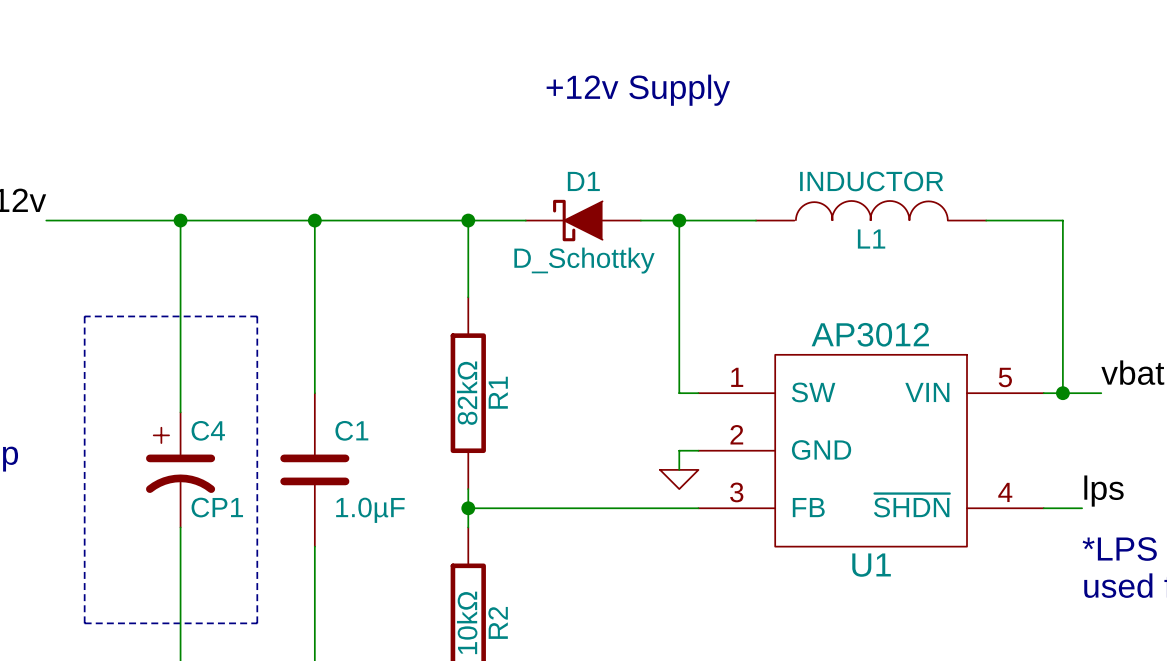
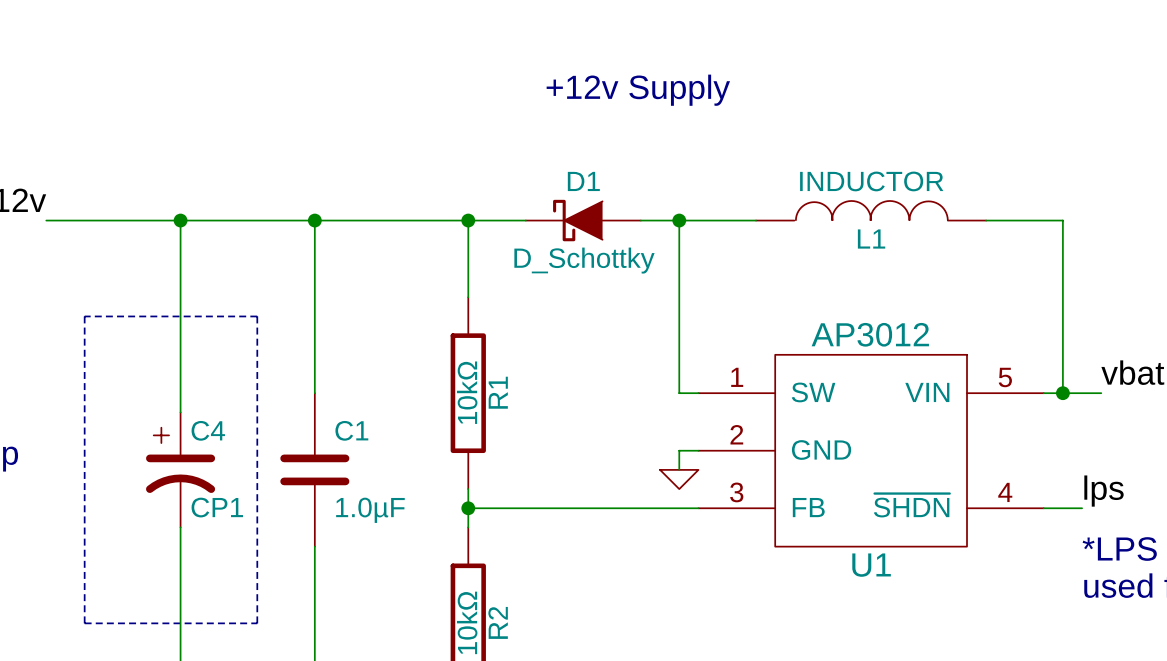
R1 value: 82kΩ (467, 393) -> 10kΩ (467, 392)

